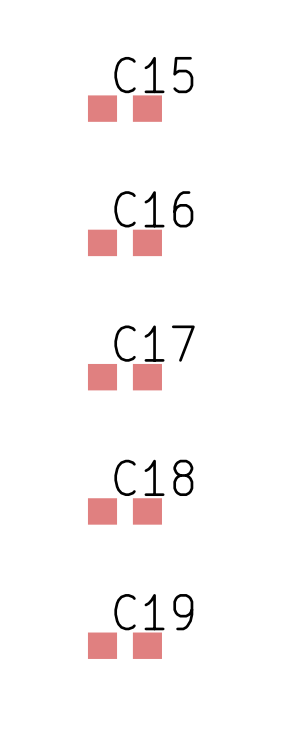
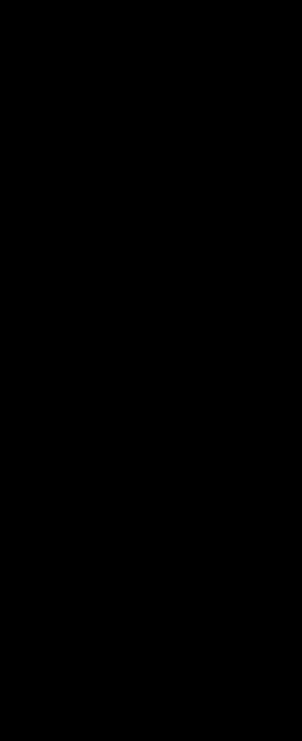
C15: (124, 108) -> none
C16: (124, 242) -> none
C17: (124, 377) -> none
C18: (124, 511) -> none
C19: (124, 645) -> none

